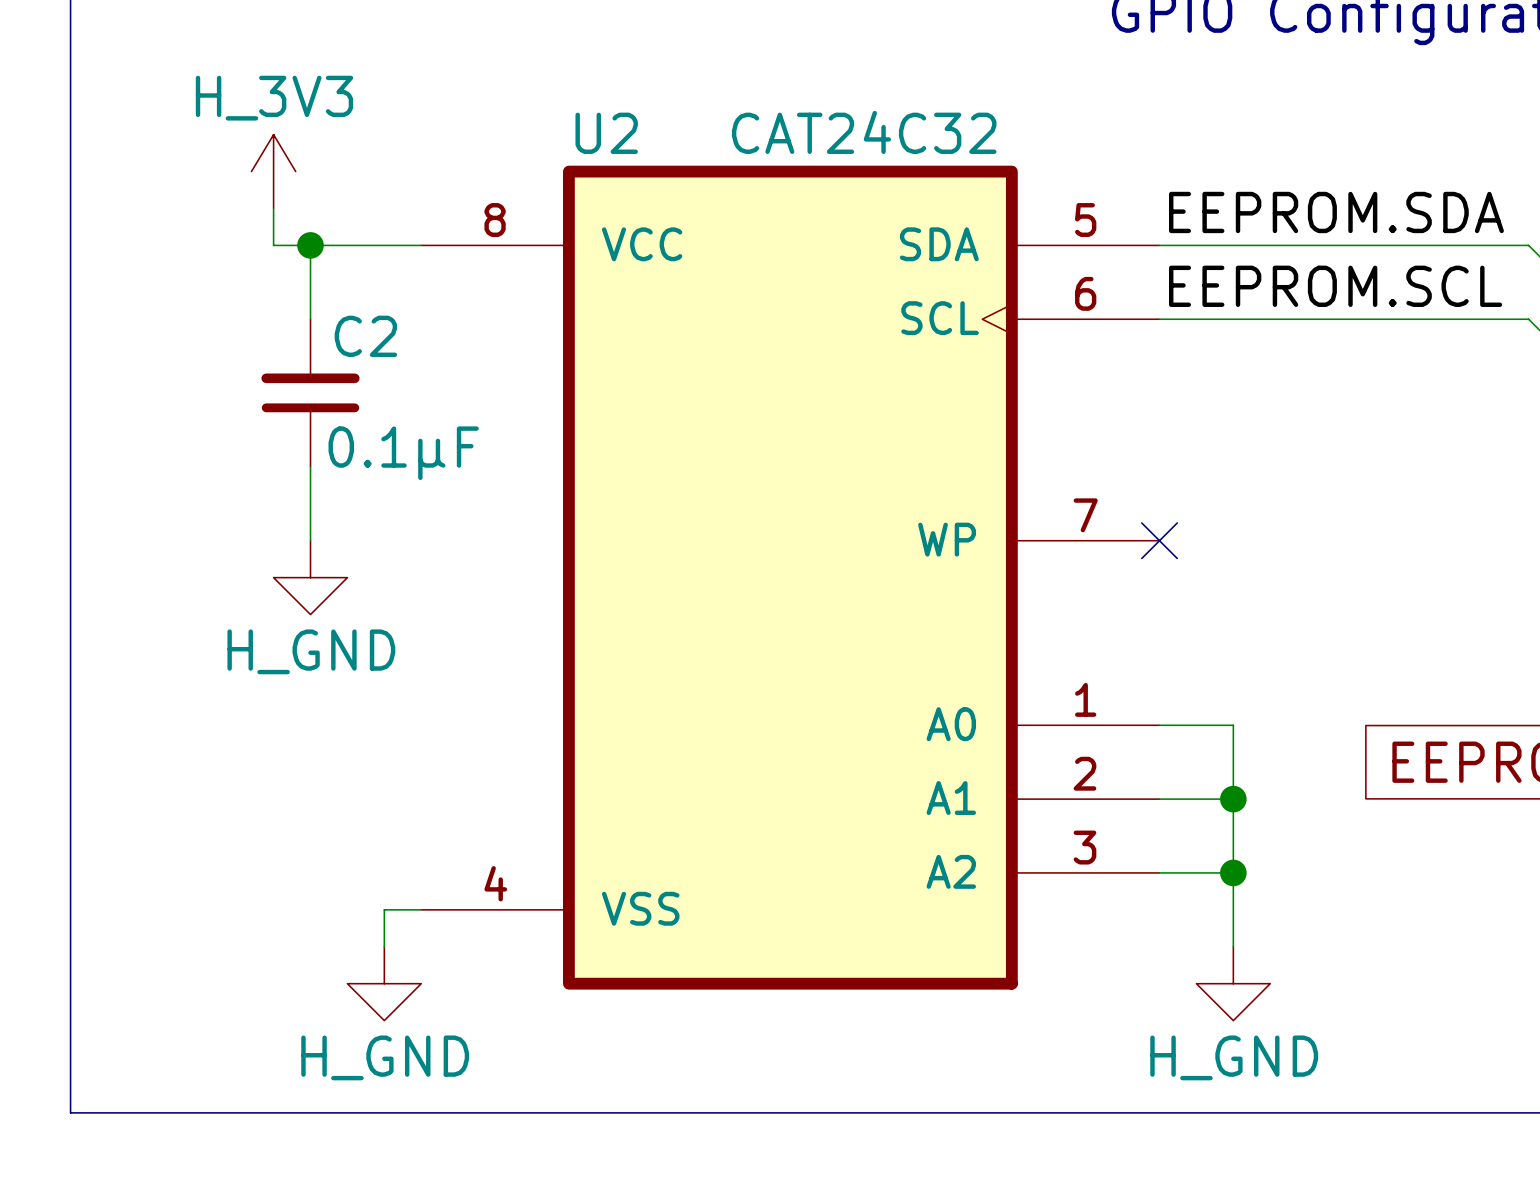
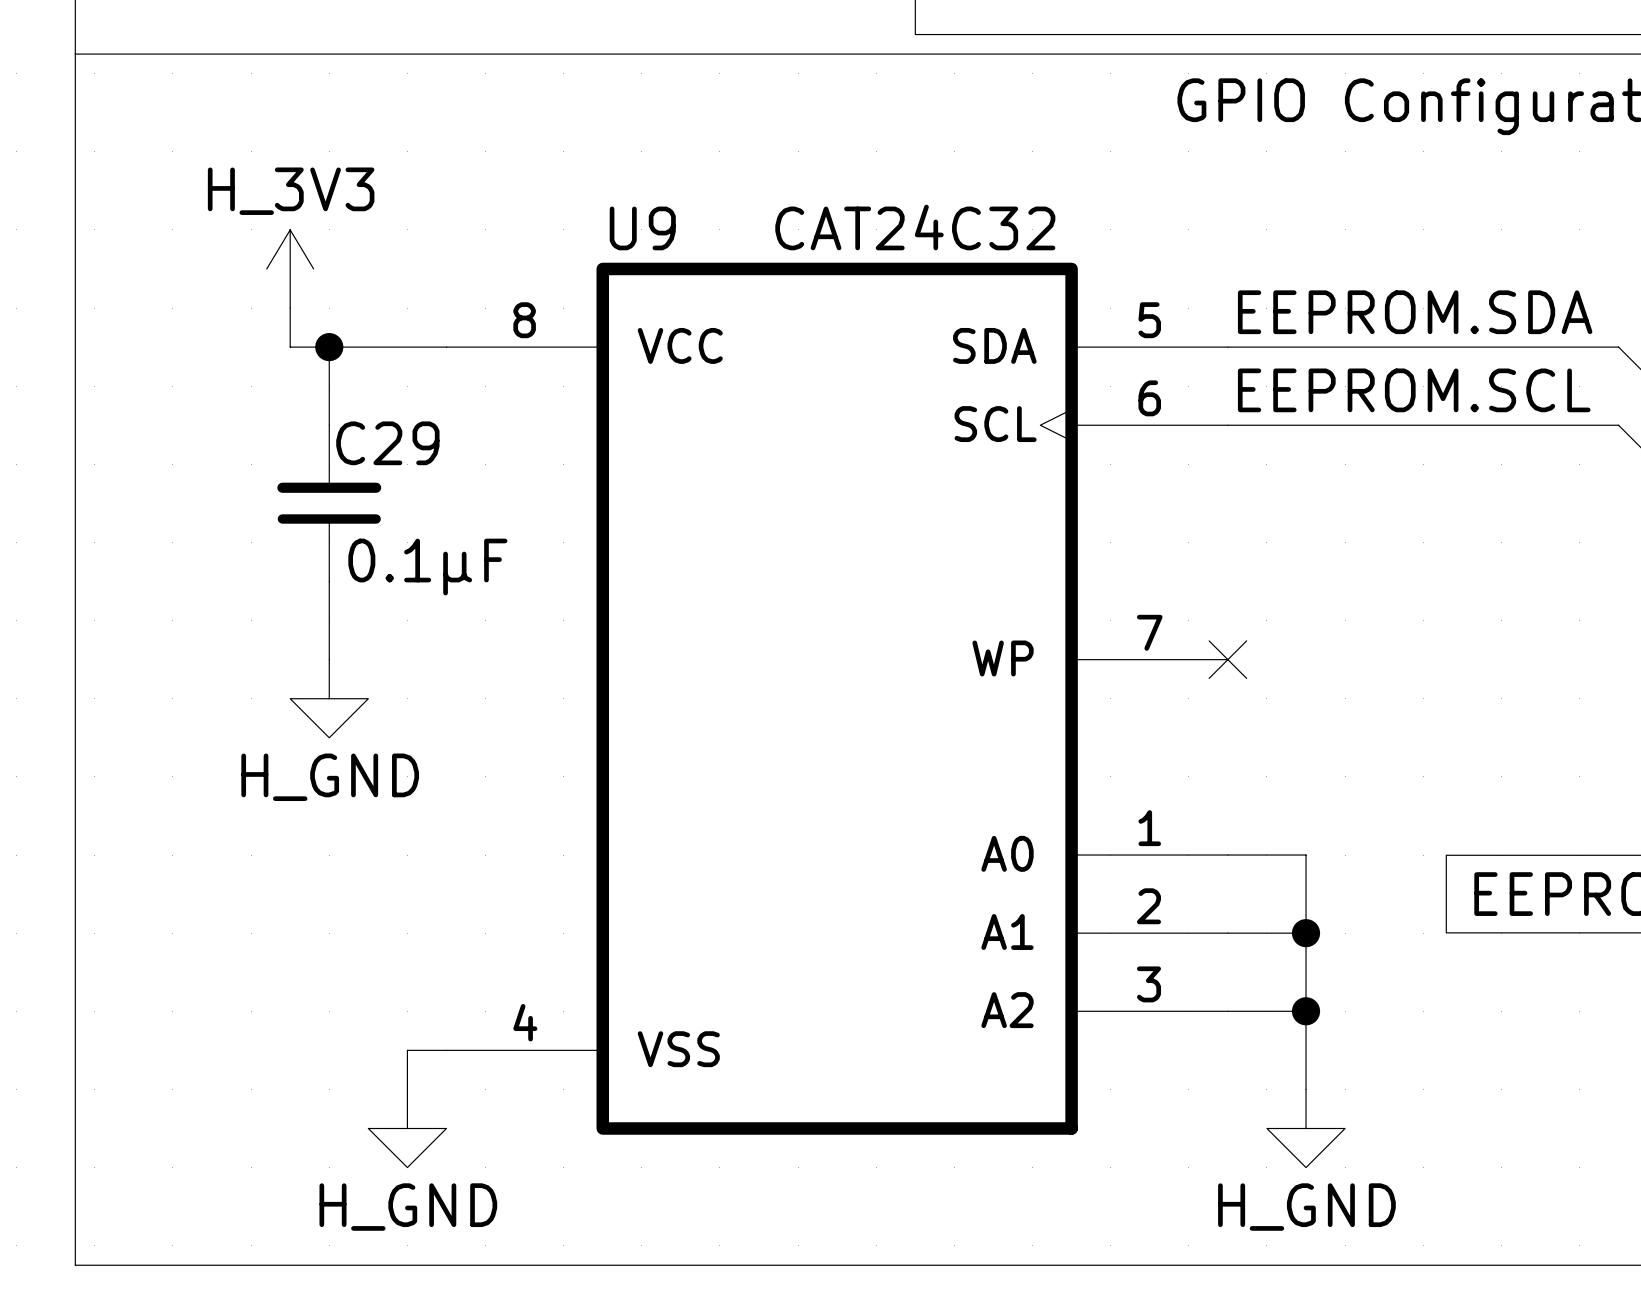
U2 name: U2 (606, 133) -> U9 (642, 228)
C2 name: C2 (365, 336) -> C29 (387, 443)

